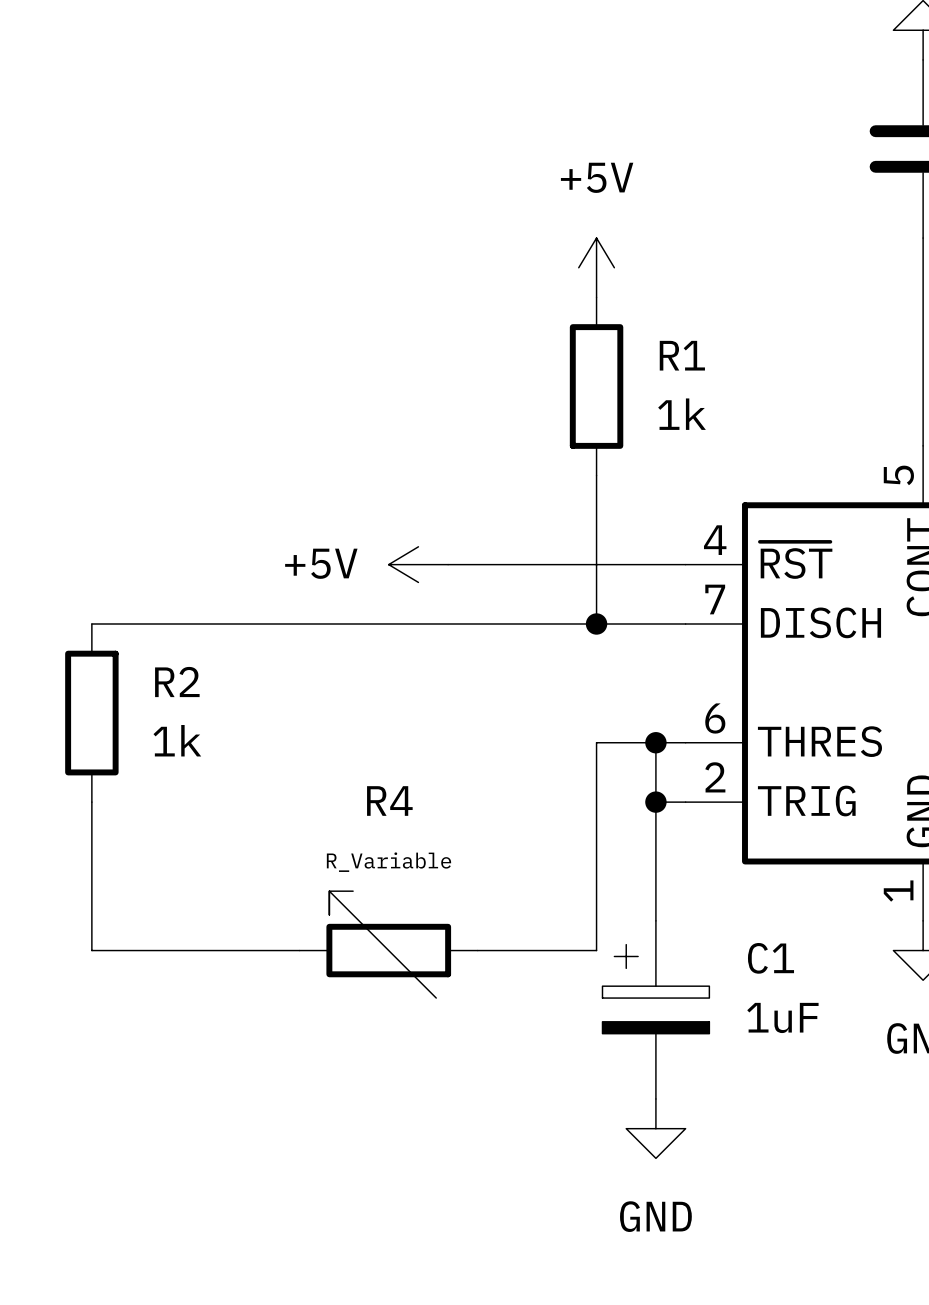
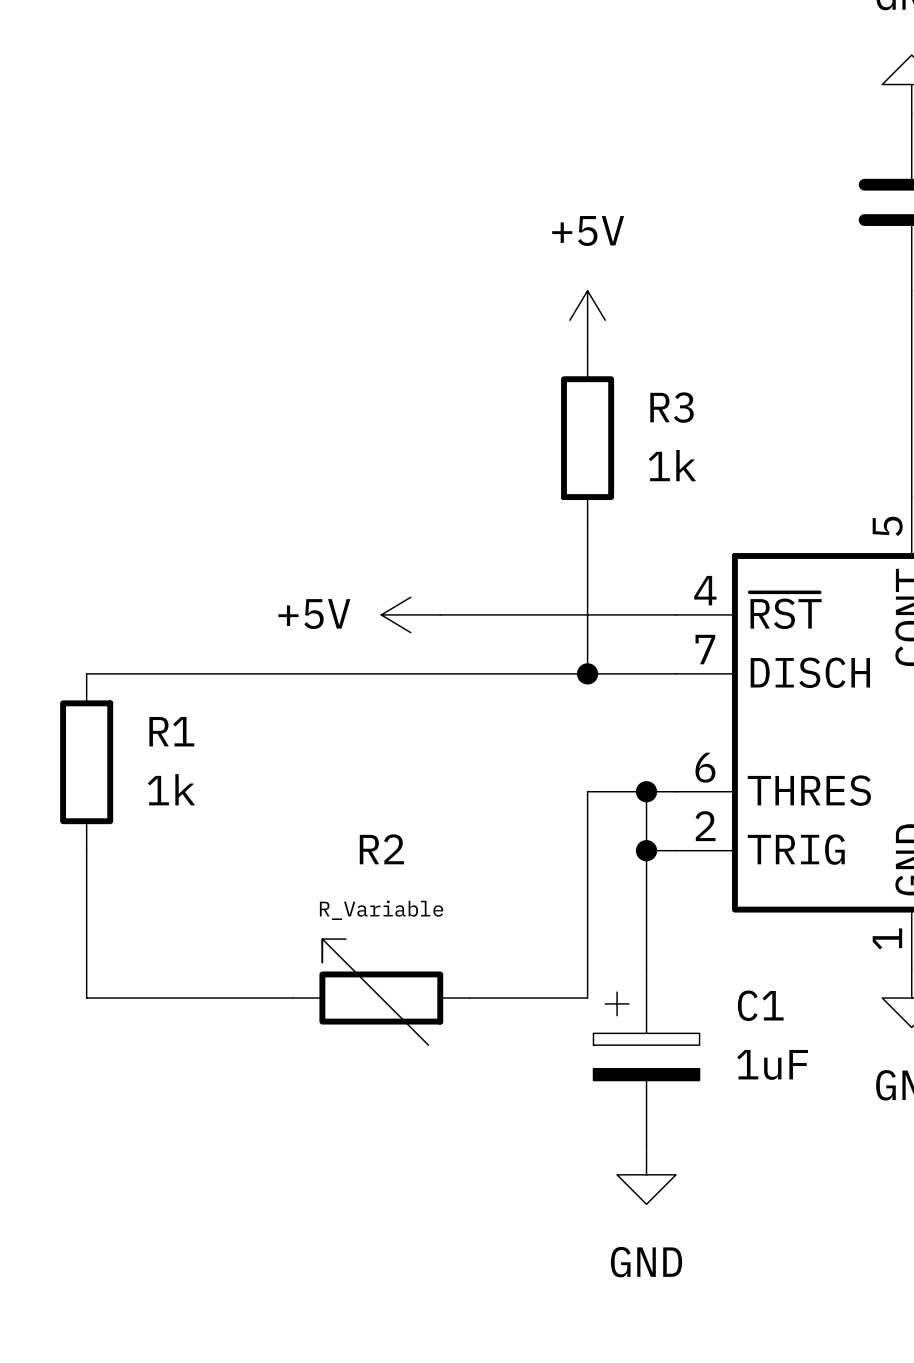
R1 name: R1 (682, 355) -> R3 (672, 407)
R2 name: R2 (177, 682) -> R1 (171, 731)
R4 name: R4 (389, 801) -> R2 (381, 849)

